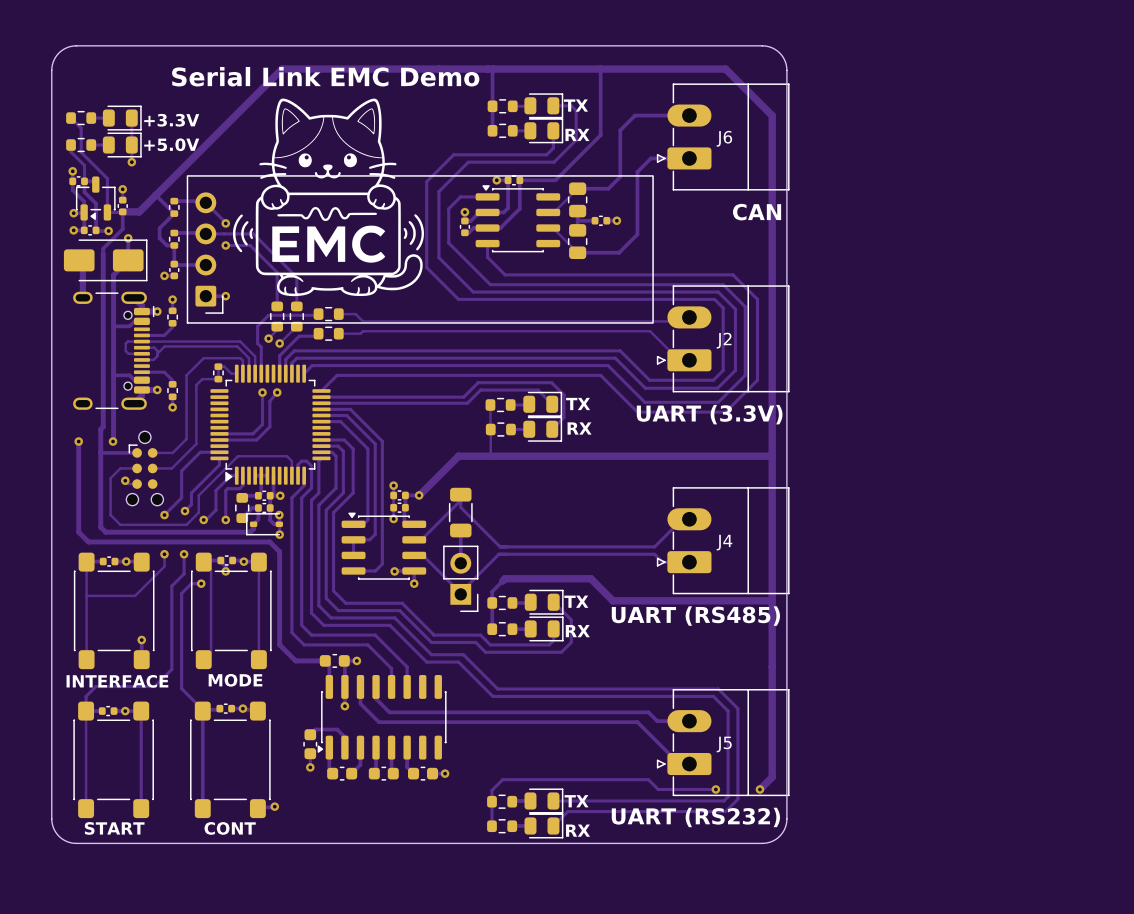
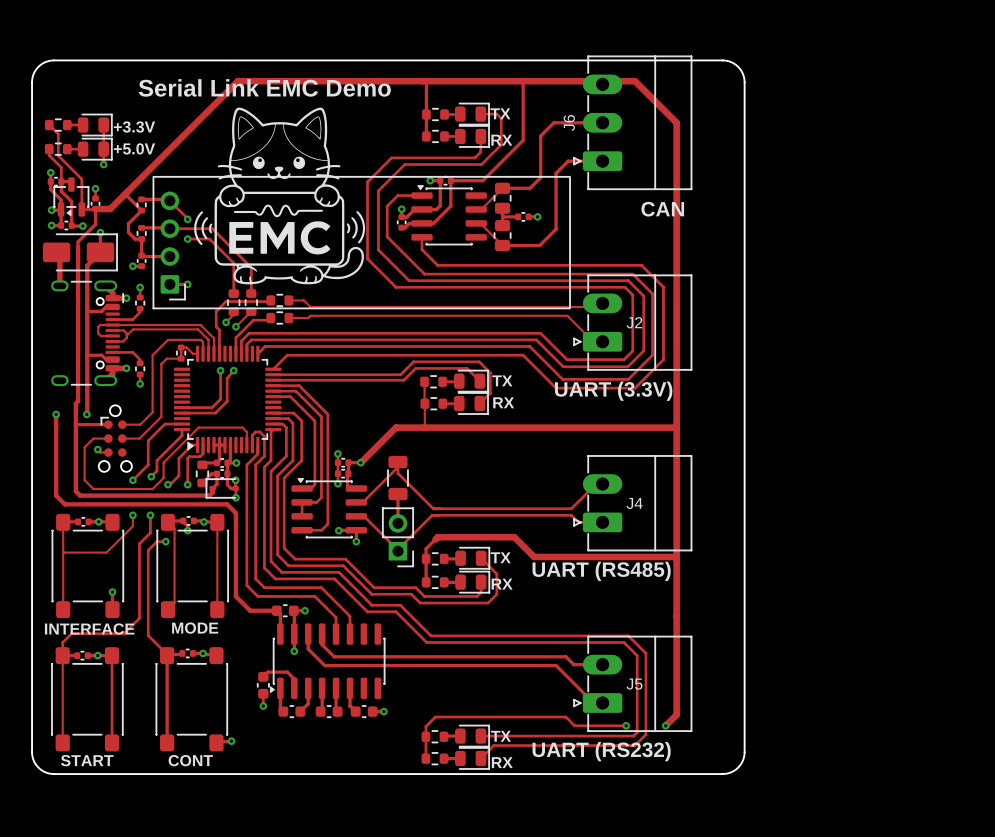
board edge: (762, 45) (773, 48) (779, 53) (785, 62) (786, 70) (786, 818) (785, 826) (779, 836) (773, 840) (762, 843) -> (667, 60) (727, 60) (739, 68) (744, 82) (744, 754) (739, 765) (727, 773) (667, 774)
J6 footprint: [656, 83, 790, 191] -> [573, 55, 693, 190]
J6 name position: J6 (724, 138) -> J6 (569, 123)

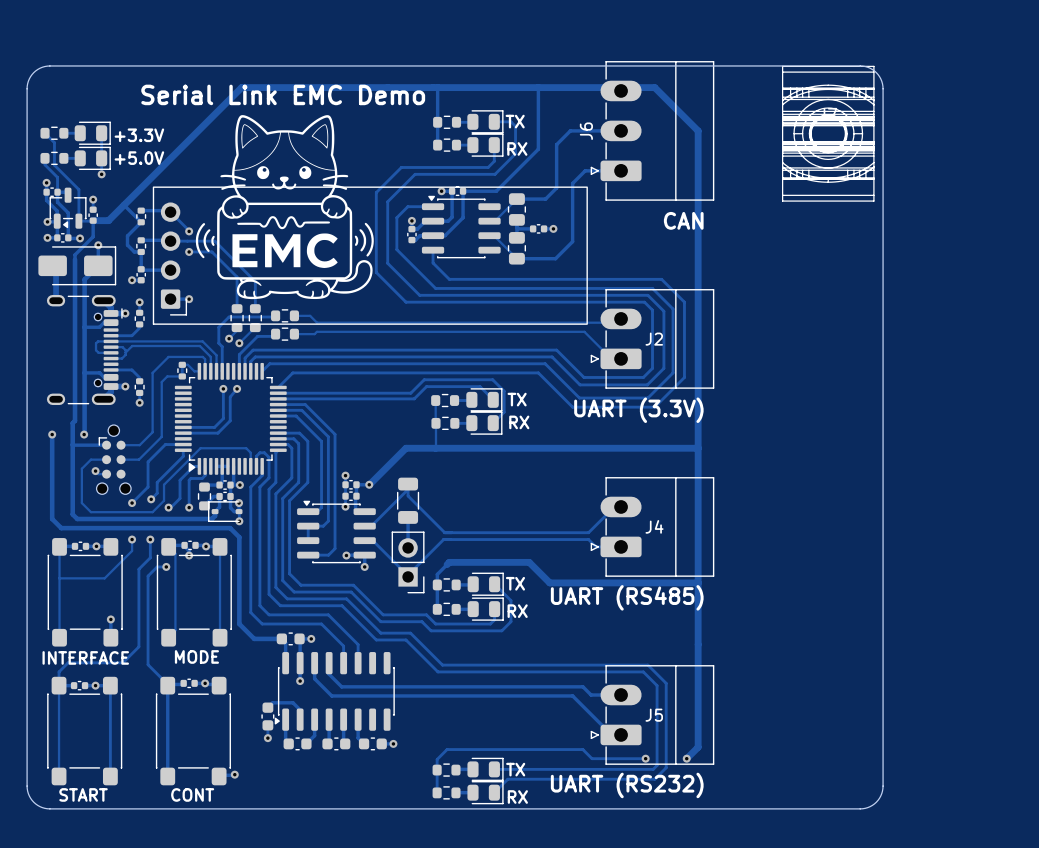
board edge: (722, 60) (729, 61) (738, 66) (742, 72) (744, 82) (744, 752) (743, 759) (738, 767) (732, 771) (722, 774) -> (746, 65) (862, 66) (870, 68) (878, 74) (883, 88) (882, 791) (876, 802) (862, 808) (746, 808)
part: none -> (828, 133)

